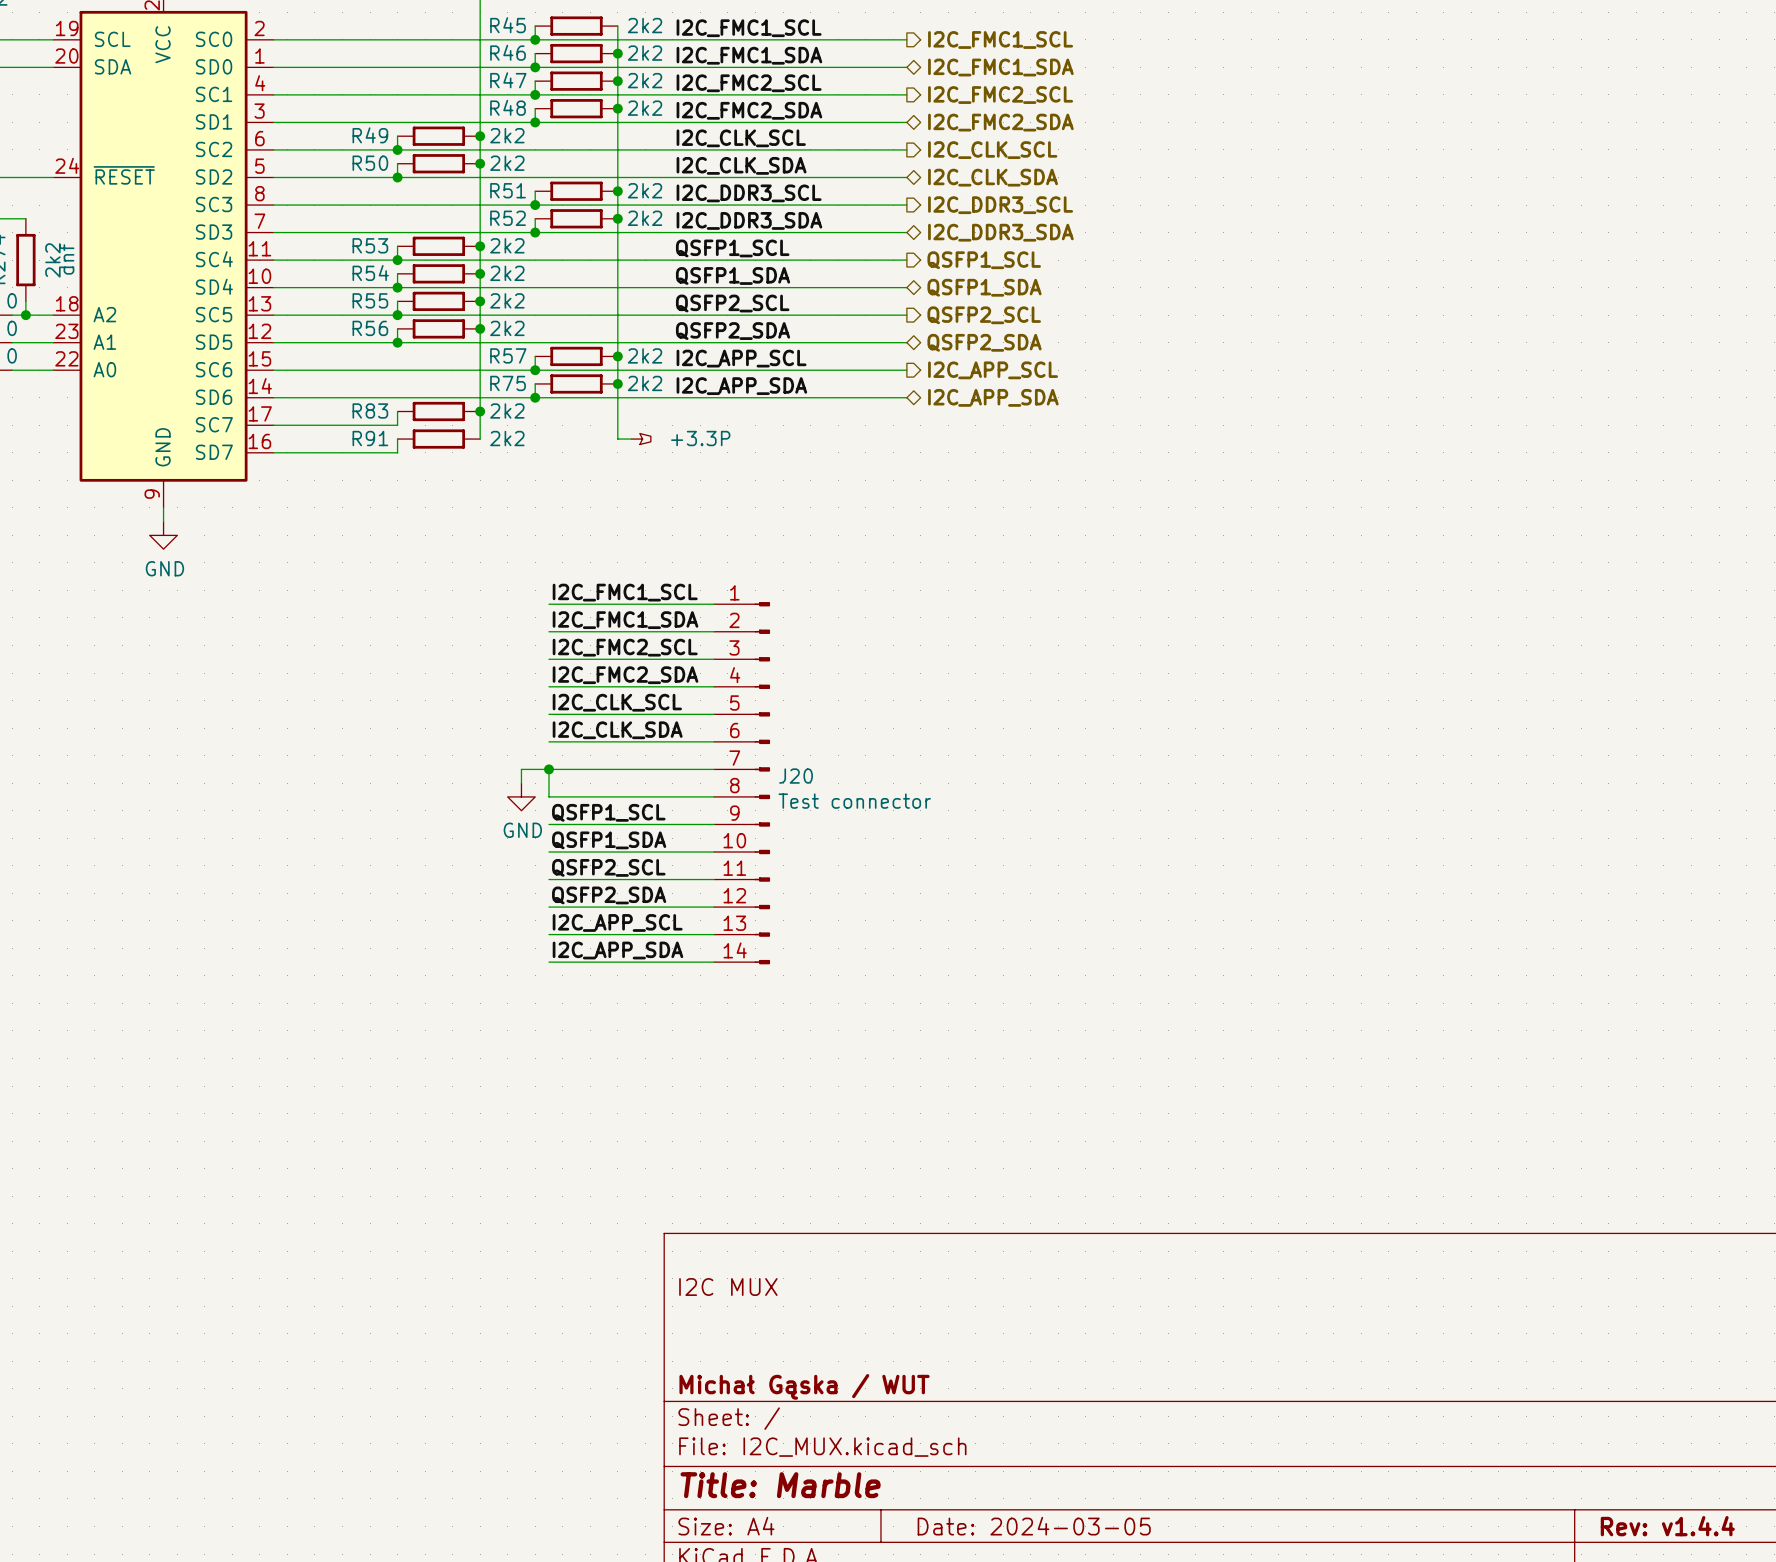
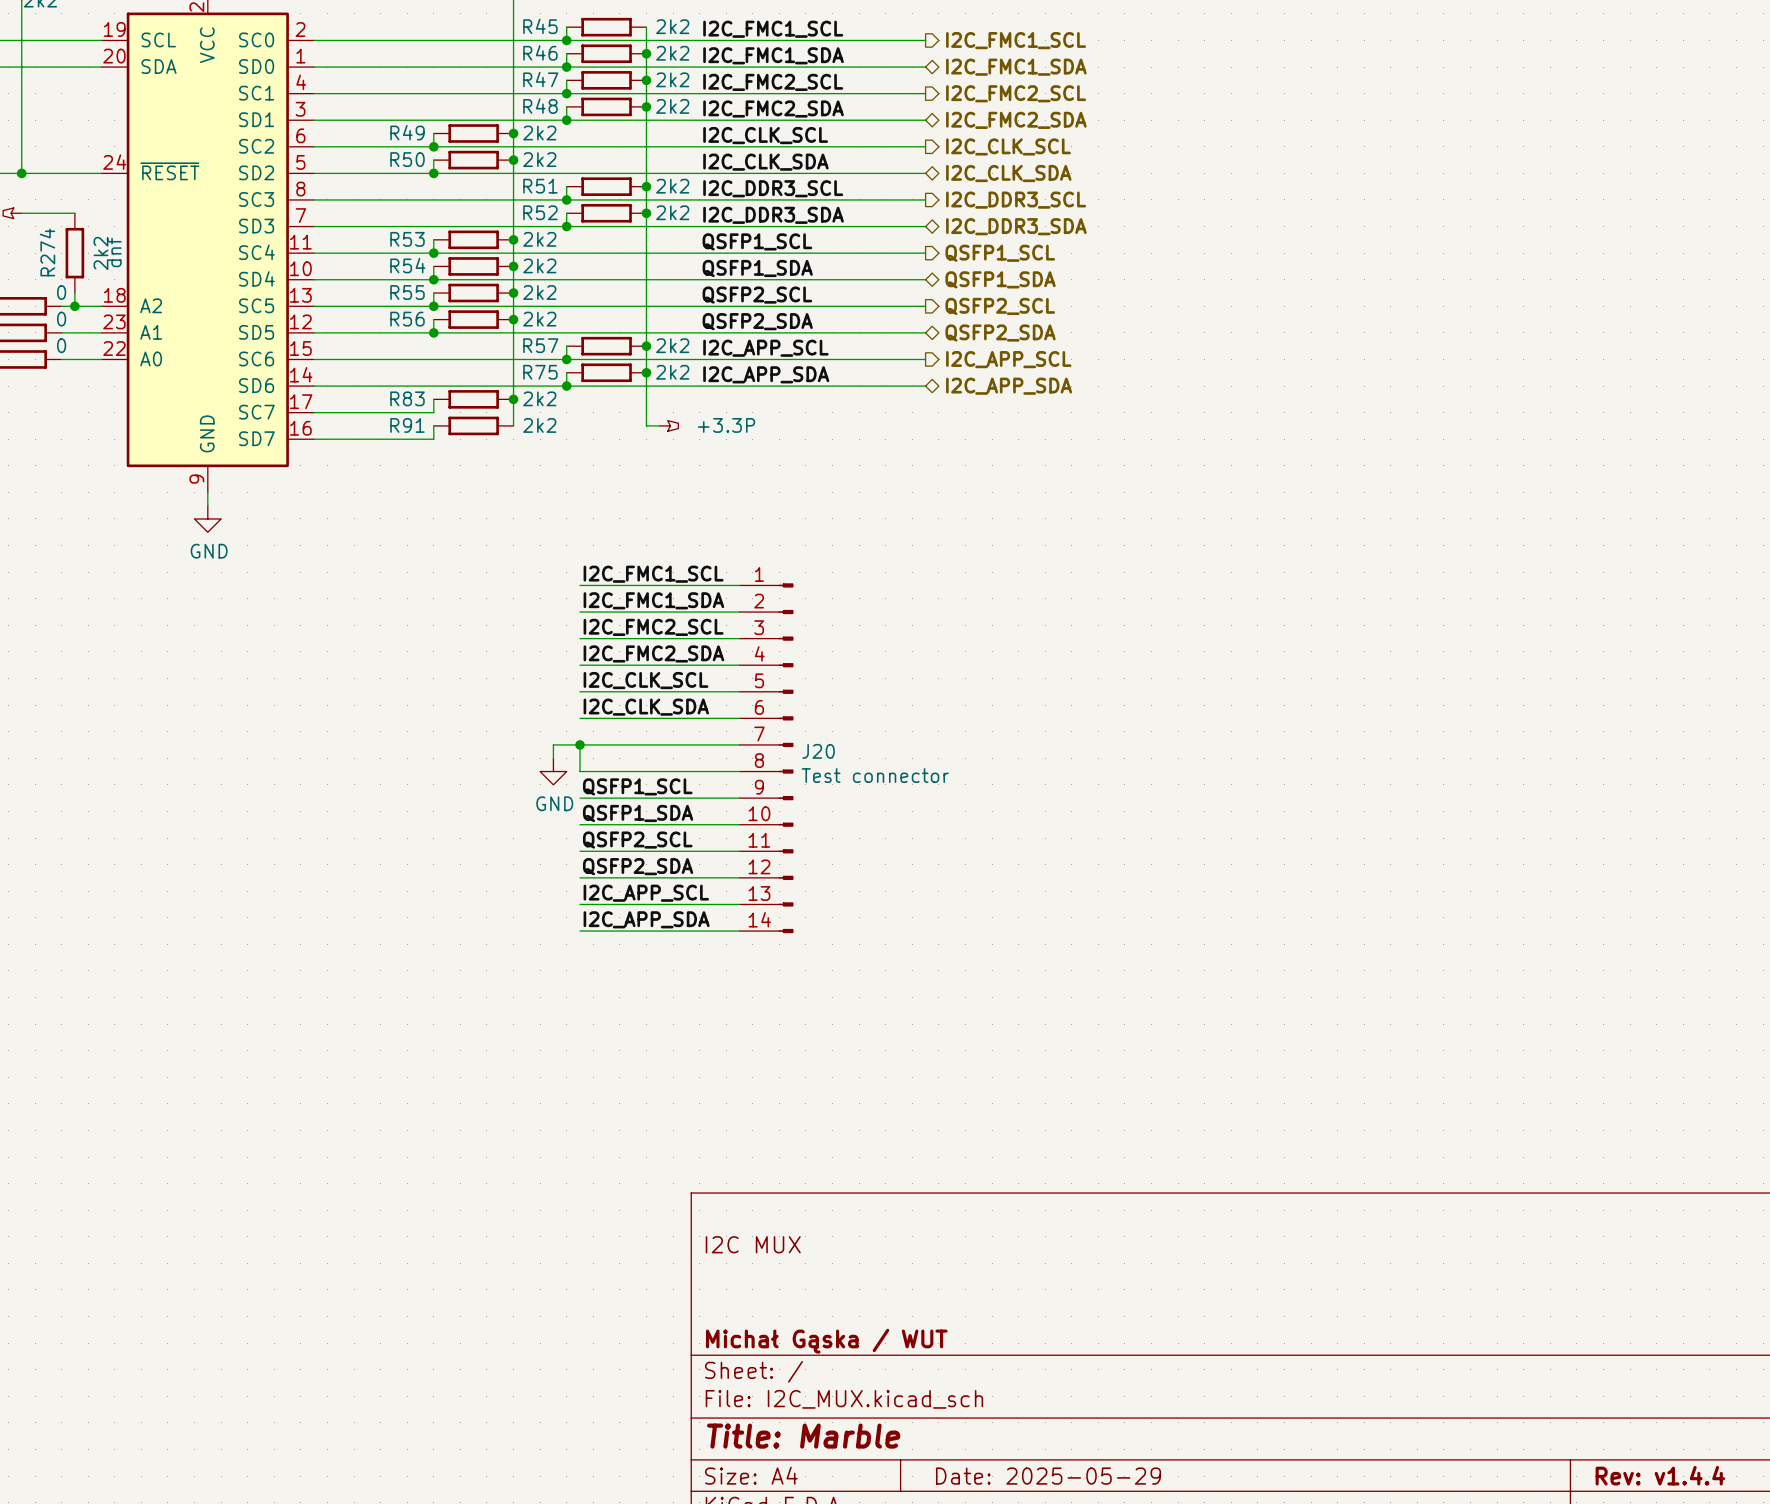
title block: Date: 2024-03-05 (1034, 1526) -> Date: 2025-05-29 (1048, 1476)

